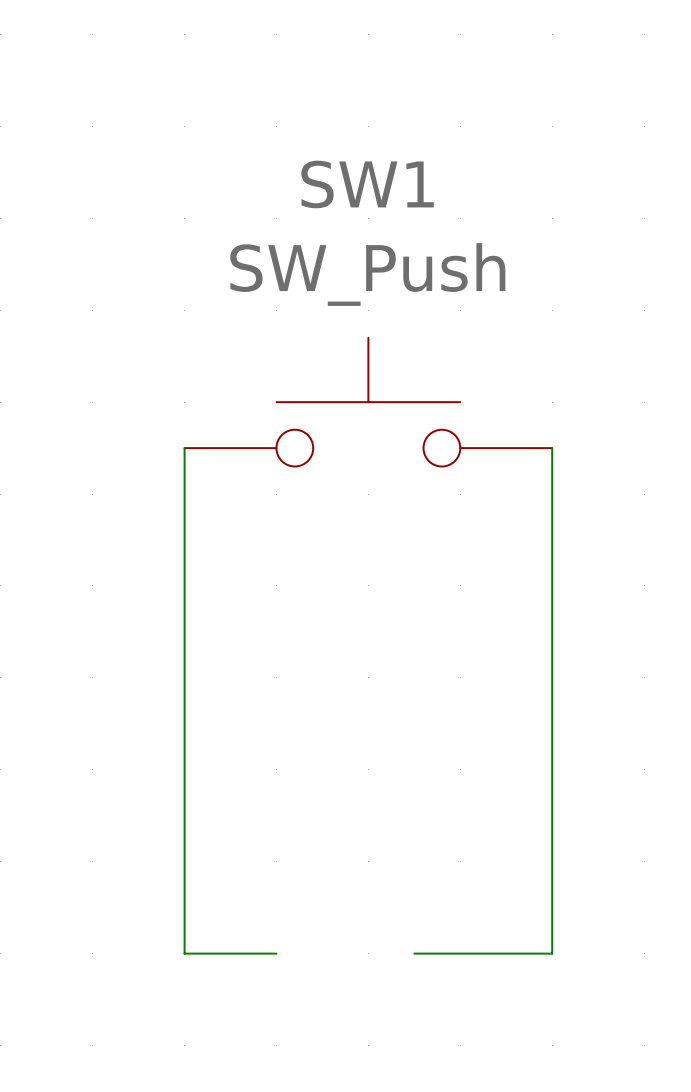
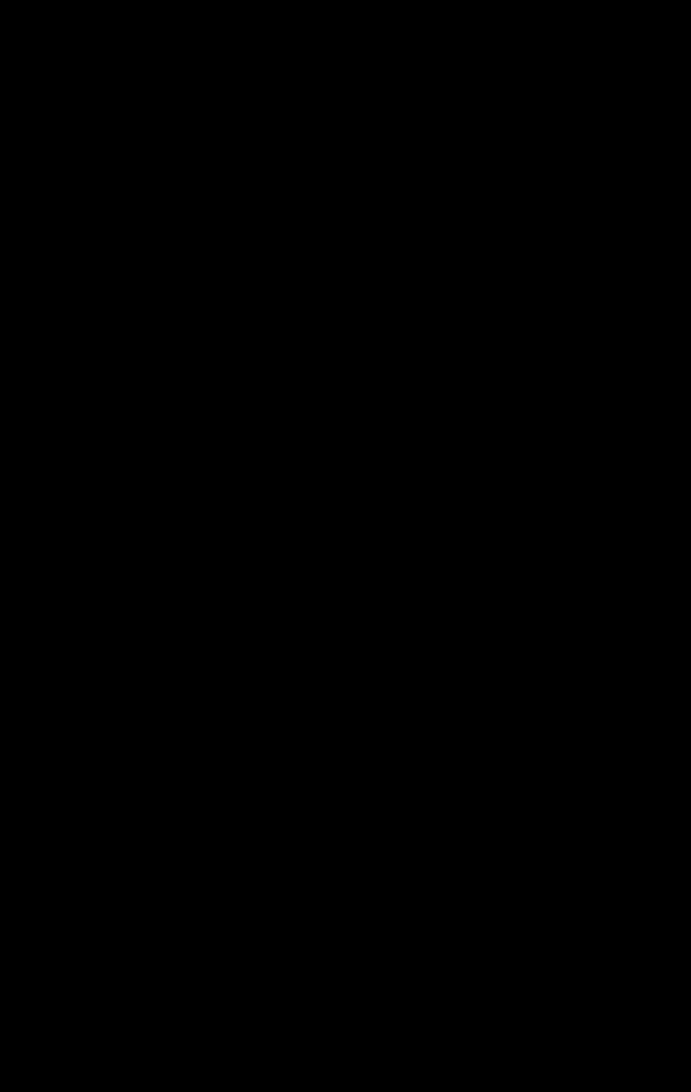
SW1: SW_Push (368, 402) -> none
wire: (184, 448) (184, 953) (276, 953) -> none
wire: (552, 448) (552, 953) (414, 953) -> none

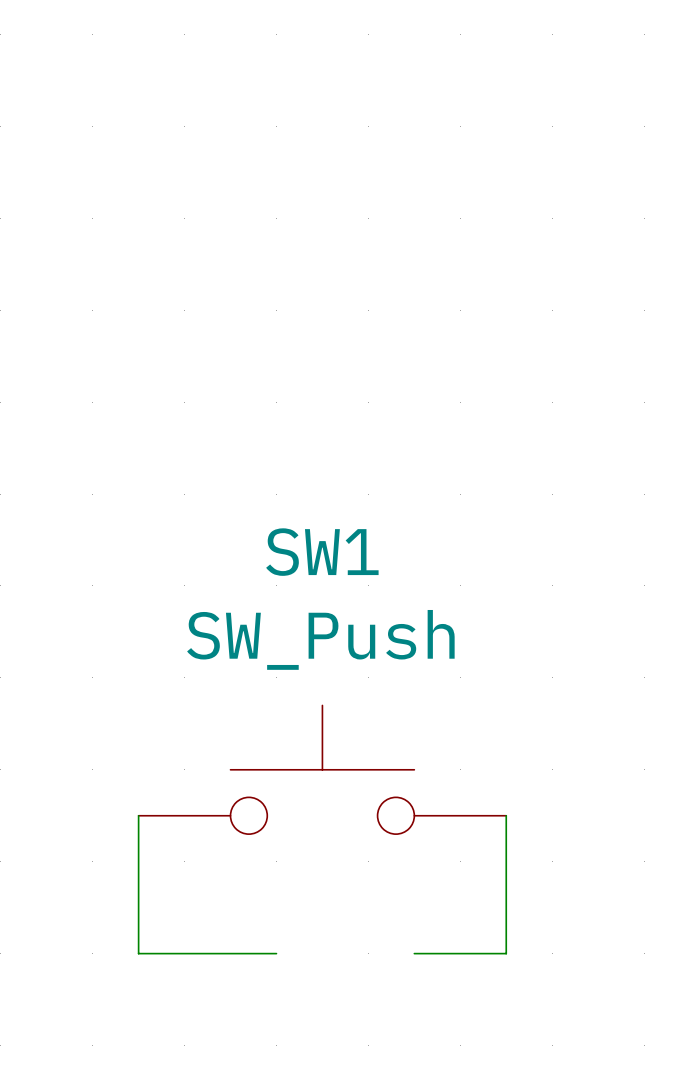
SW1: none -> SW_Push (322, 769)
wire: none -> (138, 815) (138, 953) (276, 953)
wire: none -> (506, 815) (506, 953) (414, 953)

